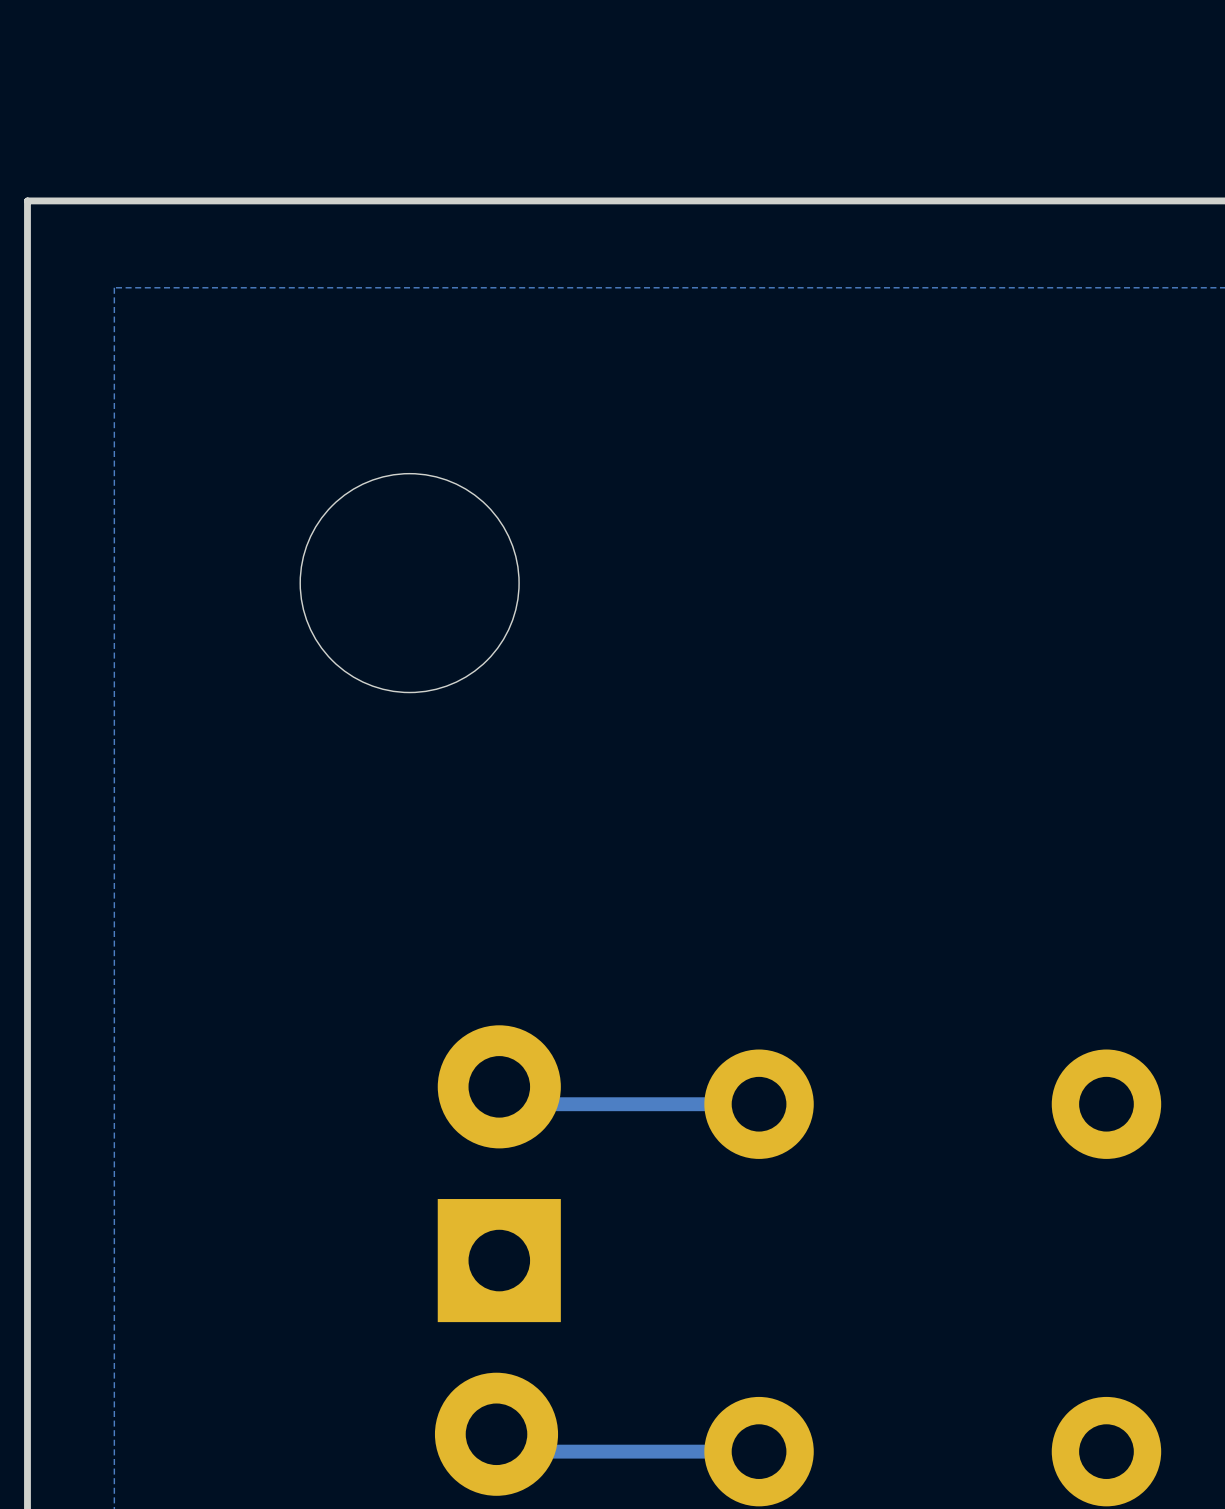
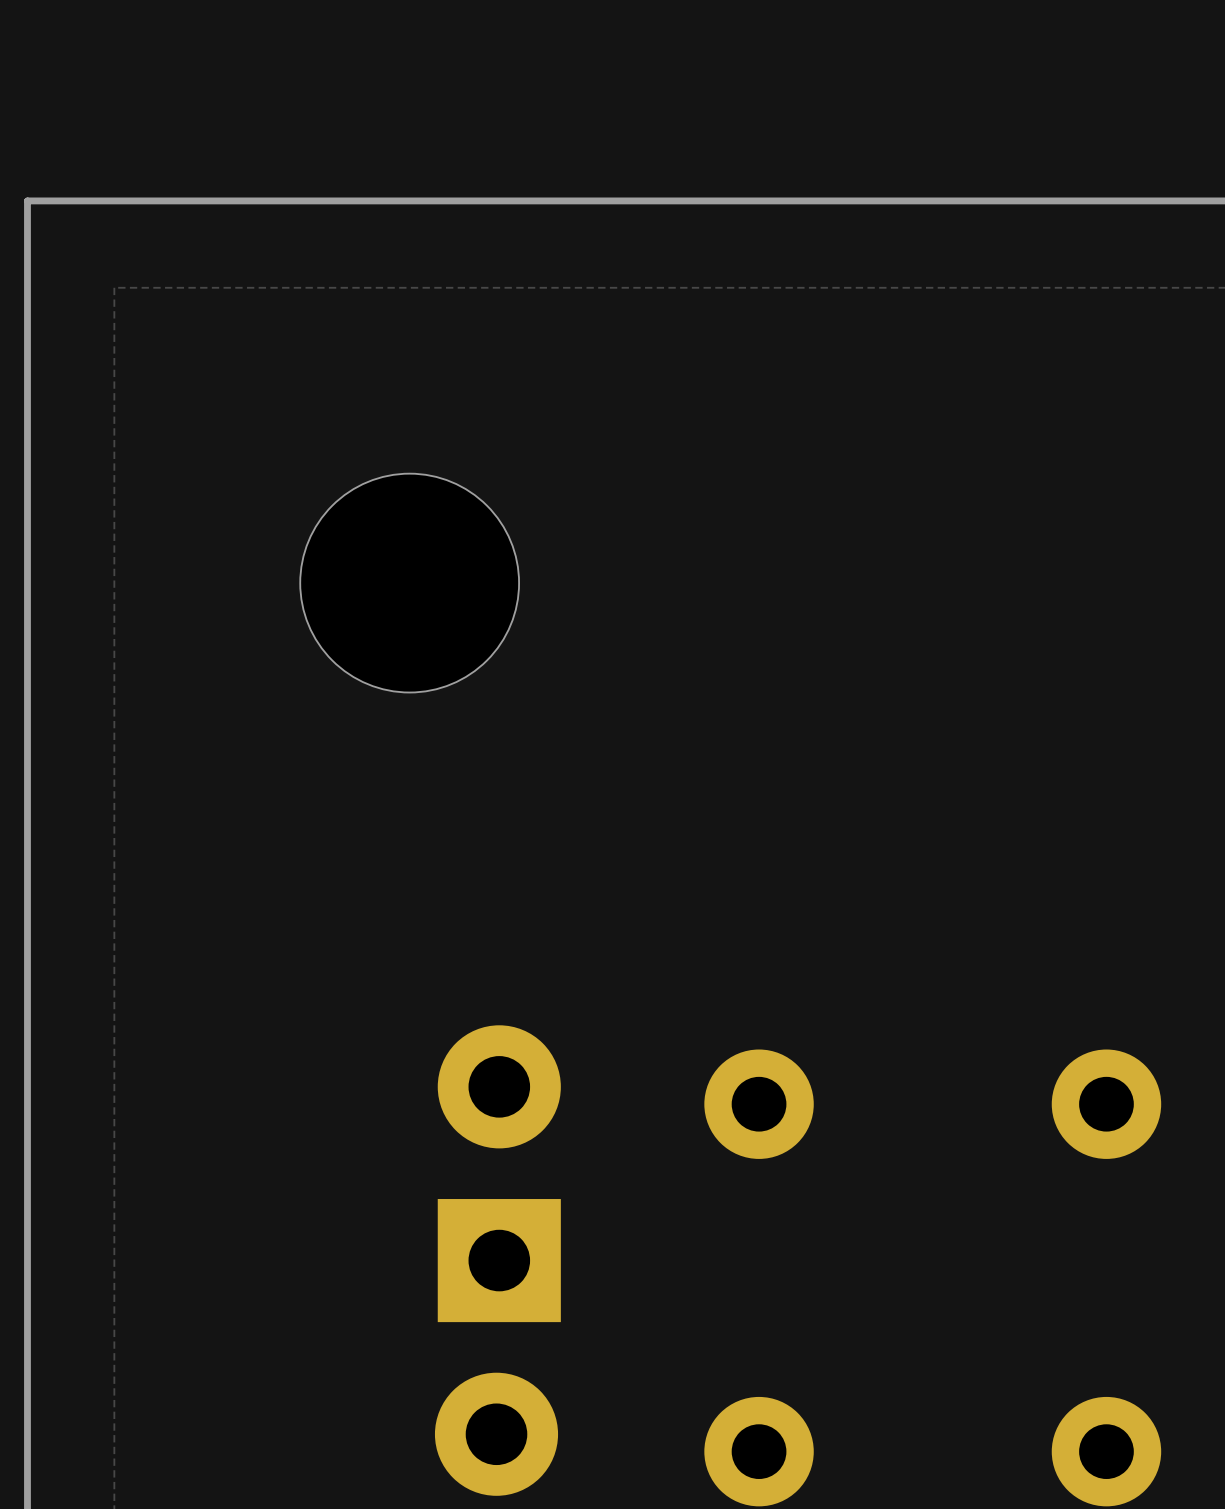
track: (759, 1104) (516, 1104) -> none
track: (759, 1451) (513, 1451) -> none

